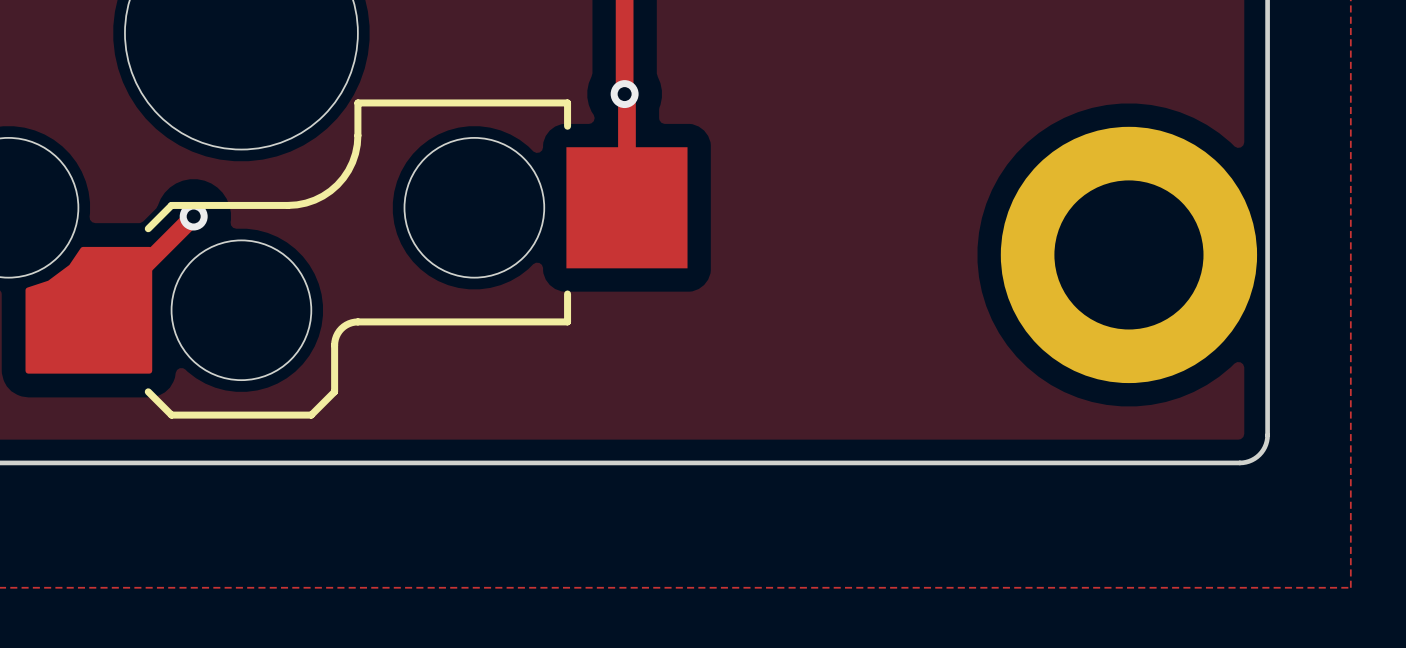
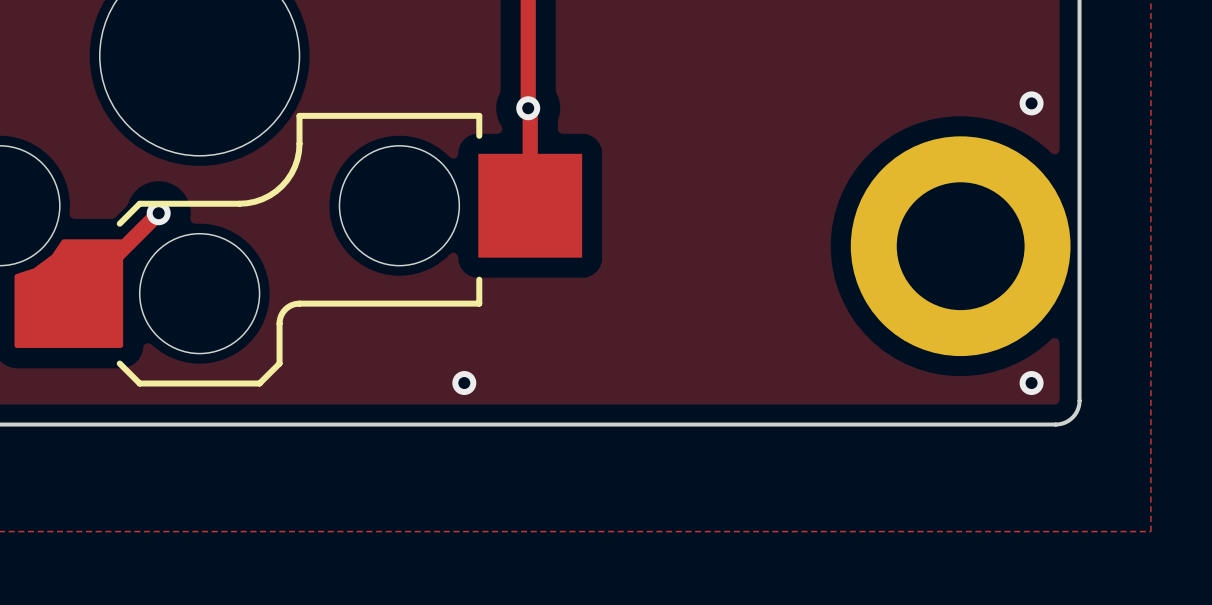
via: none -> (1031, 103)
via: none -> (464, 383)
via: none -> (1031, 383)

